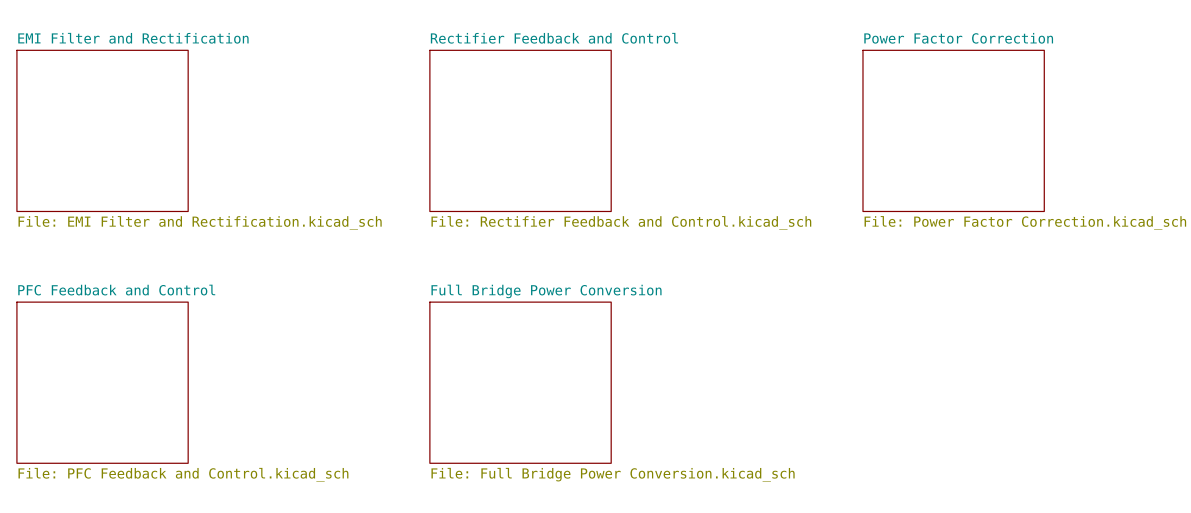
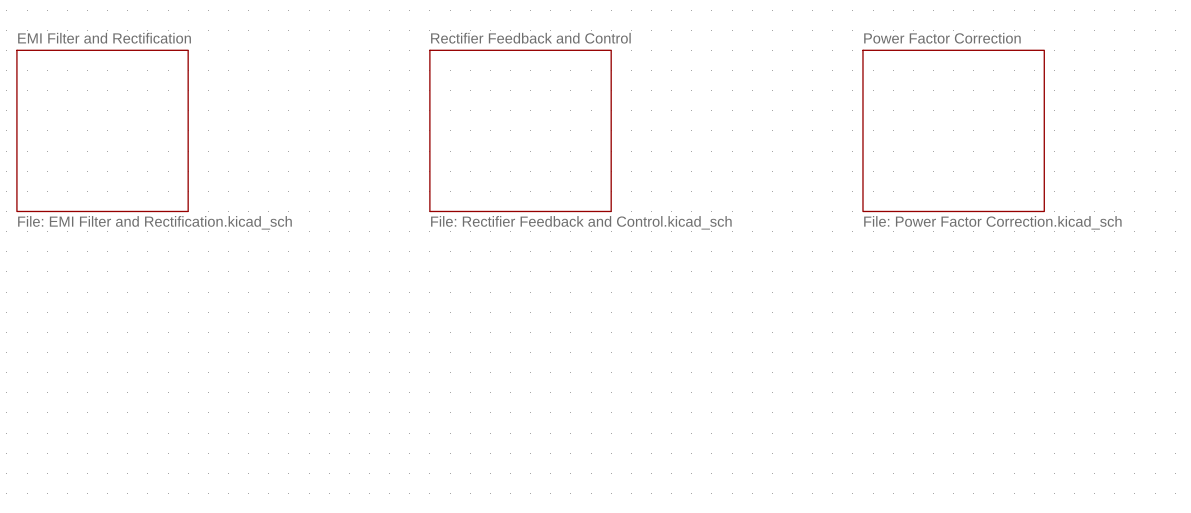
sheet PFC Feedback and Control: File: PFC Feedback and Control.kicad_sch (102, 382) -> none
sheet Full Bridge Power Conversion: File: Full Bridge Power Conversion.kicad_sch (520, 382) -> none

